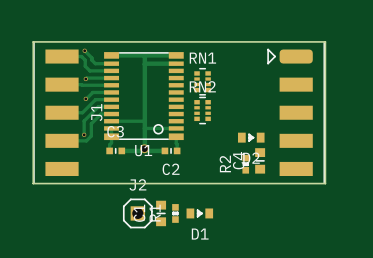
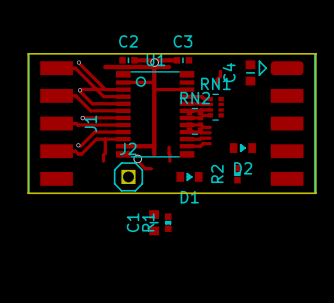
track: none -> (154, 60) (154, 154)
track: (84, 50) (95, 63) (111, 63) -> none
via: none -> (154, 62)
track: none -> (80, 64) (105, 89) (123, 89)
track: (144, 55) (144, 150) -> none
track: (81, 56) (85, 60) (85, 66) (89, 70) (111, 70) -> (75, 68) (103, 96) (123, 96)
track: none -> (220, 71) (217, 85)
track: (176, 63) (144, 64) -> none
track: none -> (187, 89) (154, 90)
track: none -> (80, 91) (92, 103) (123, 103)
RN1 position: (202, 81) -> (215, 107)
track: (82, 85) (111, 85) -> (76, 96) (90, 110) (123, 110)
track: none -> (187, 96) (201, 96) (204, 99) (210, 99)
track: (111, 92) (92, 92) (85, 98) -> none
track: none -> (187, 103) (210, 104)
U1 rotation: 0° (143, 96) -> 180° (155, 114)
via: (85, 98) -> none
track: none -> (210, 109) (187, 110)
track: (111, 99) (95, 99) (81, 112) -> (123, 124) (76, 123)
track: none -> (210, 115) (187, 117)
track: (111, 106) (98, 106) (84, 121) (84, 134) -> none
via: none -> (82, 118)
track: none -> (123, 117) (82, 118)
track: (111, 114) (101, 114) (91, 123) (91, 135) (86, 140) (81, 140) -> (123, 139) (96, 139) (81, 154) (75, 151)
track: none -> (187, 124) (210, 127)
track: (144, 120) (111, 121) -> none
track: none -> (123, 132) (94, 132) (80, 146)
track: none -> (187, 132) (210, 132)
track: none -> (210, 138) (187, 139)
track: (144, 128) (176, 128) -> (123, 82) (154, 82)
track: none -> (210, 143) (187, 146)
track: none -> (154, 145) (123, 146)
C3 position: (115, 150) -> (182, 60)
track: (121, 150) (164, 150) -> (134, 60) (176, 60)
C2 position: (171, 150) -> (128, 60)
track: none -> (140, 163) (145, 168) (151, 168)
C4 position: (260, 160) -> (250, 72)
C2 name position: C2 (171, 169) -> C2 (128, 41)
J2 position: (137, 213) -> (128, 176)
D1 position: (199, 213) -> (189, 176)

